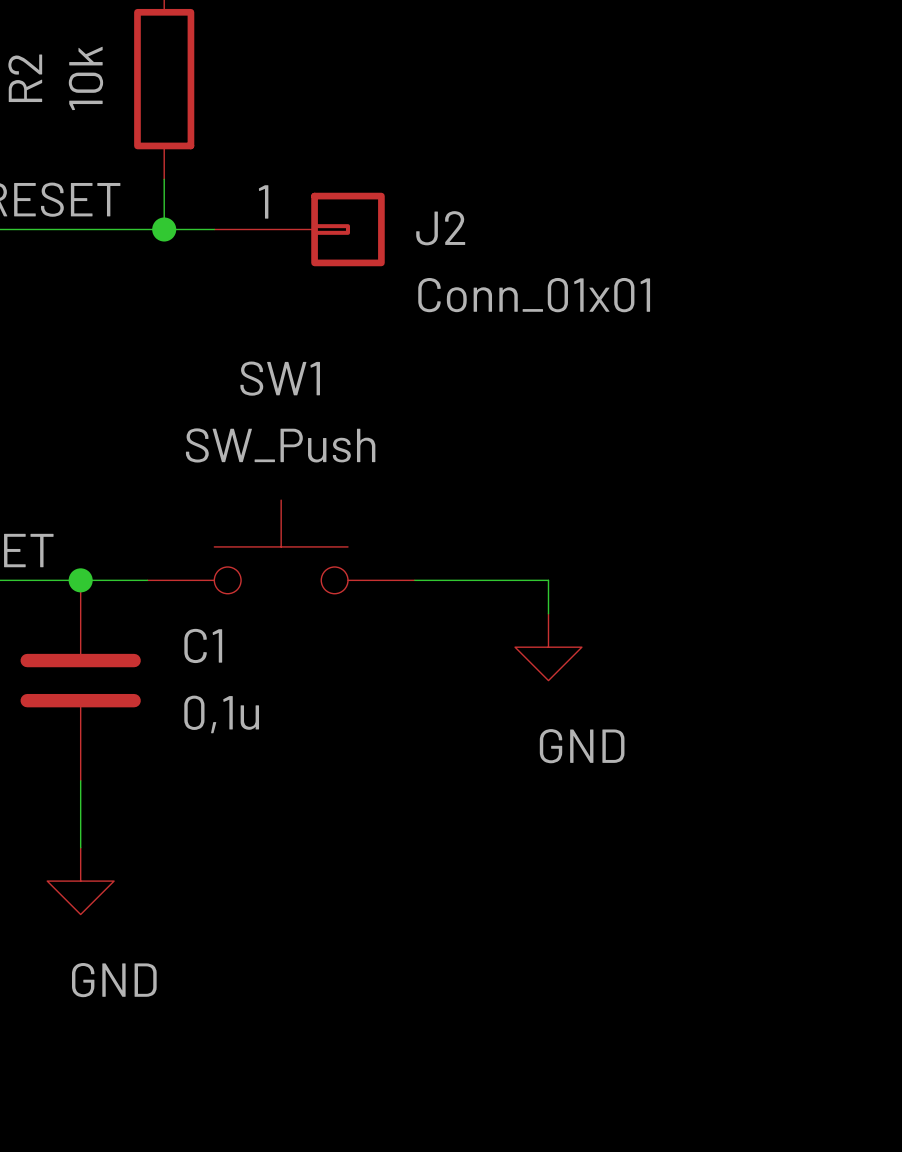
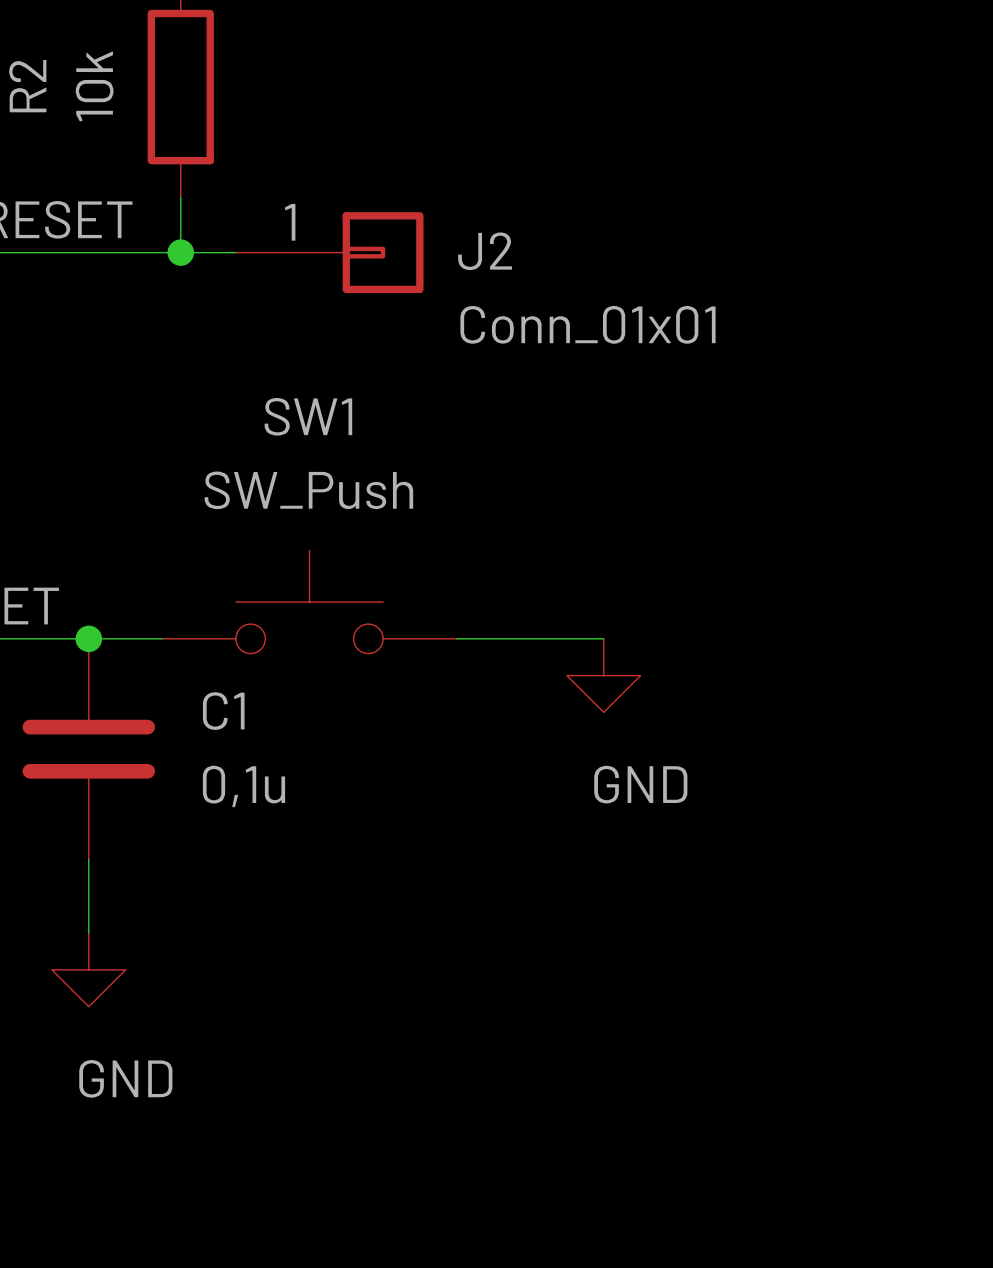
power symbol position: GND (548, 647) -> GND (603, 675)

